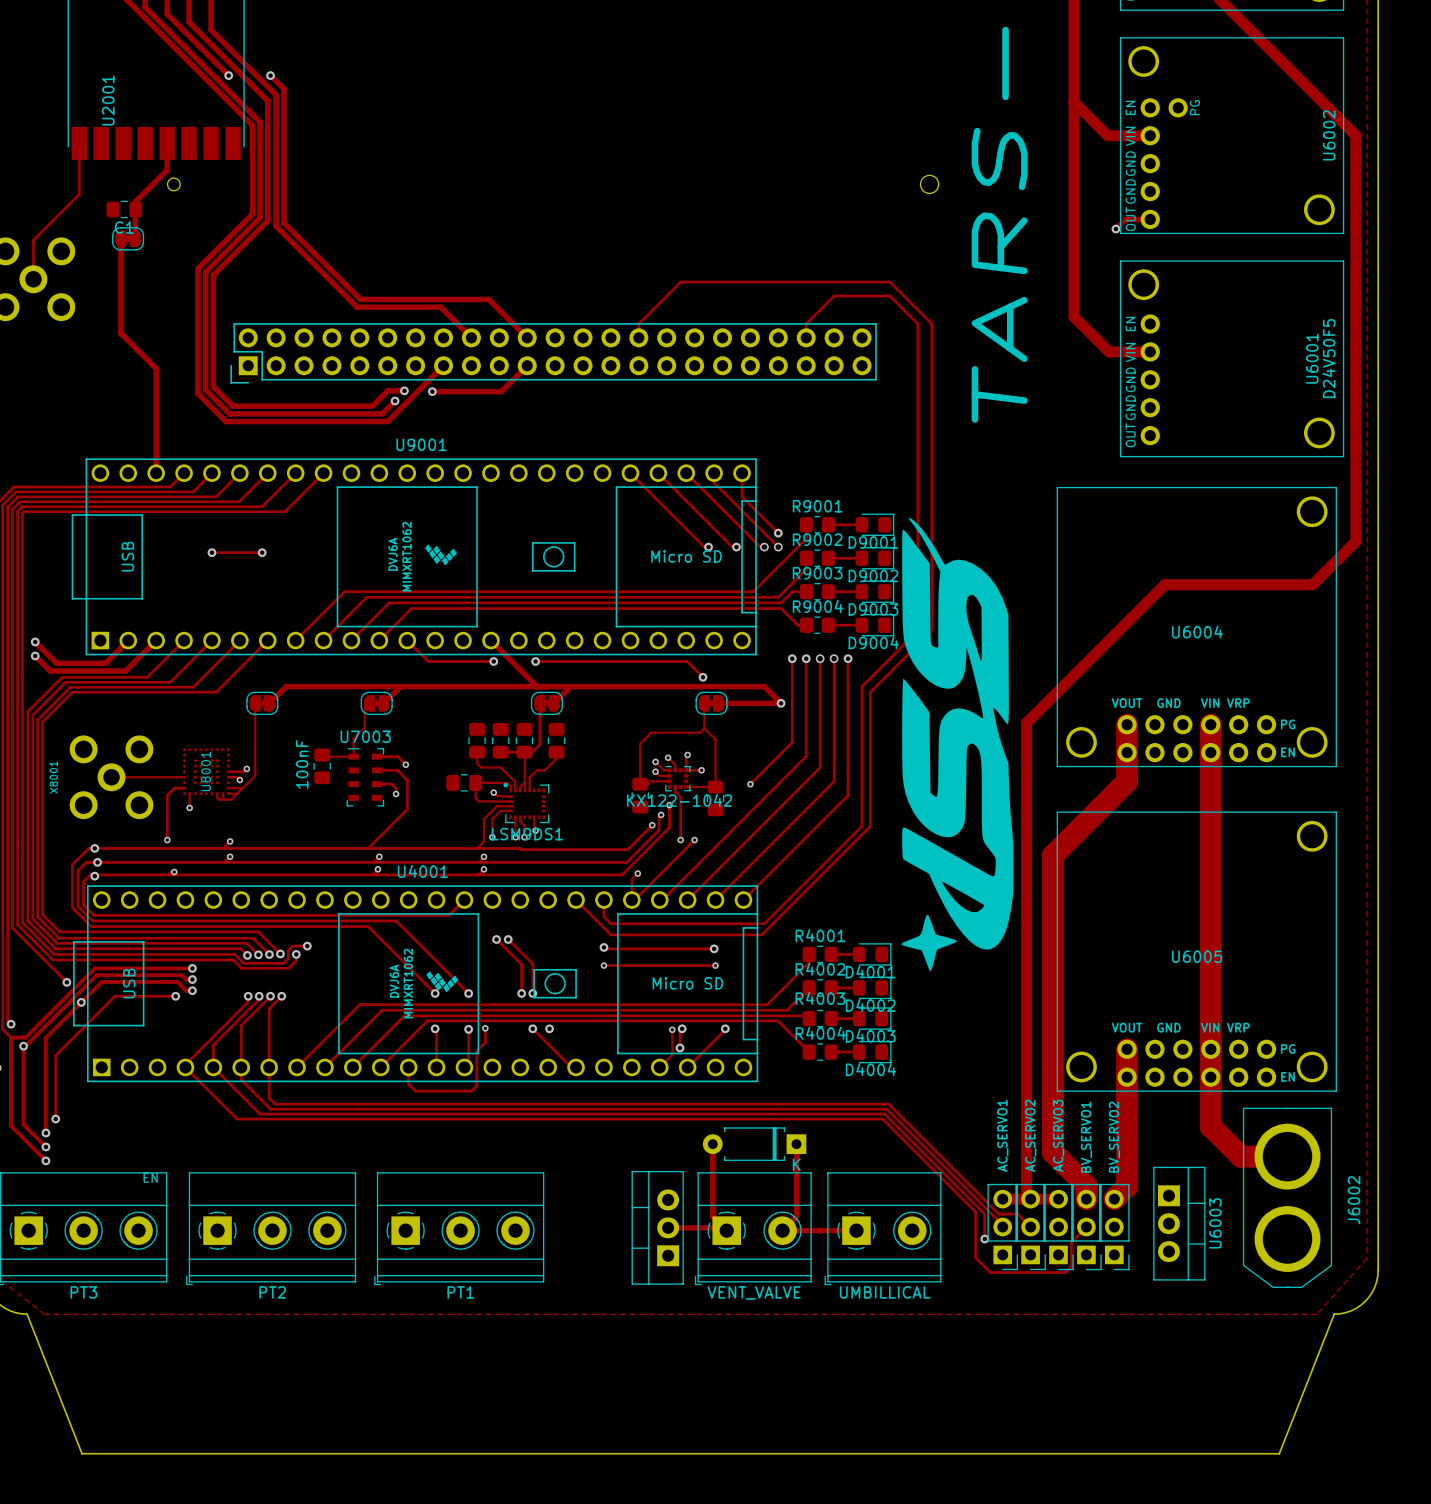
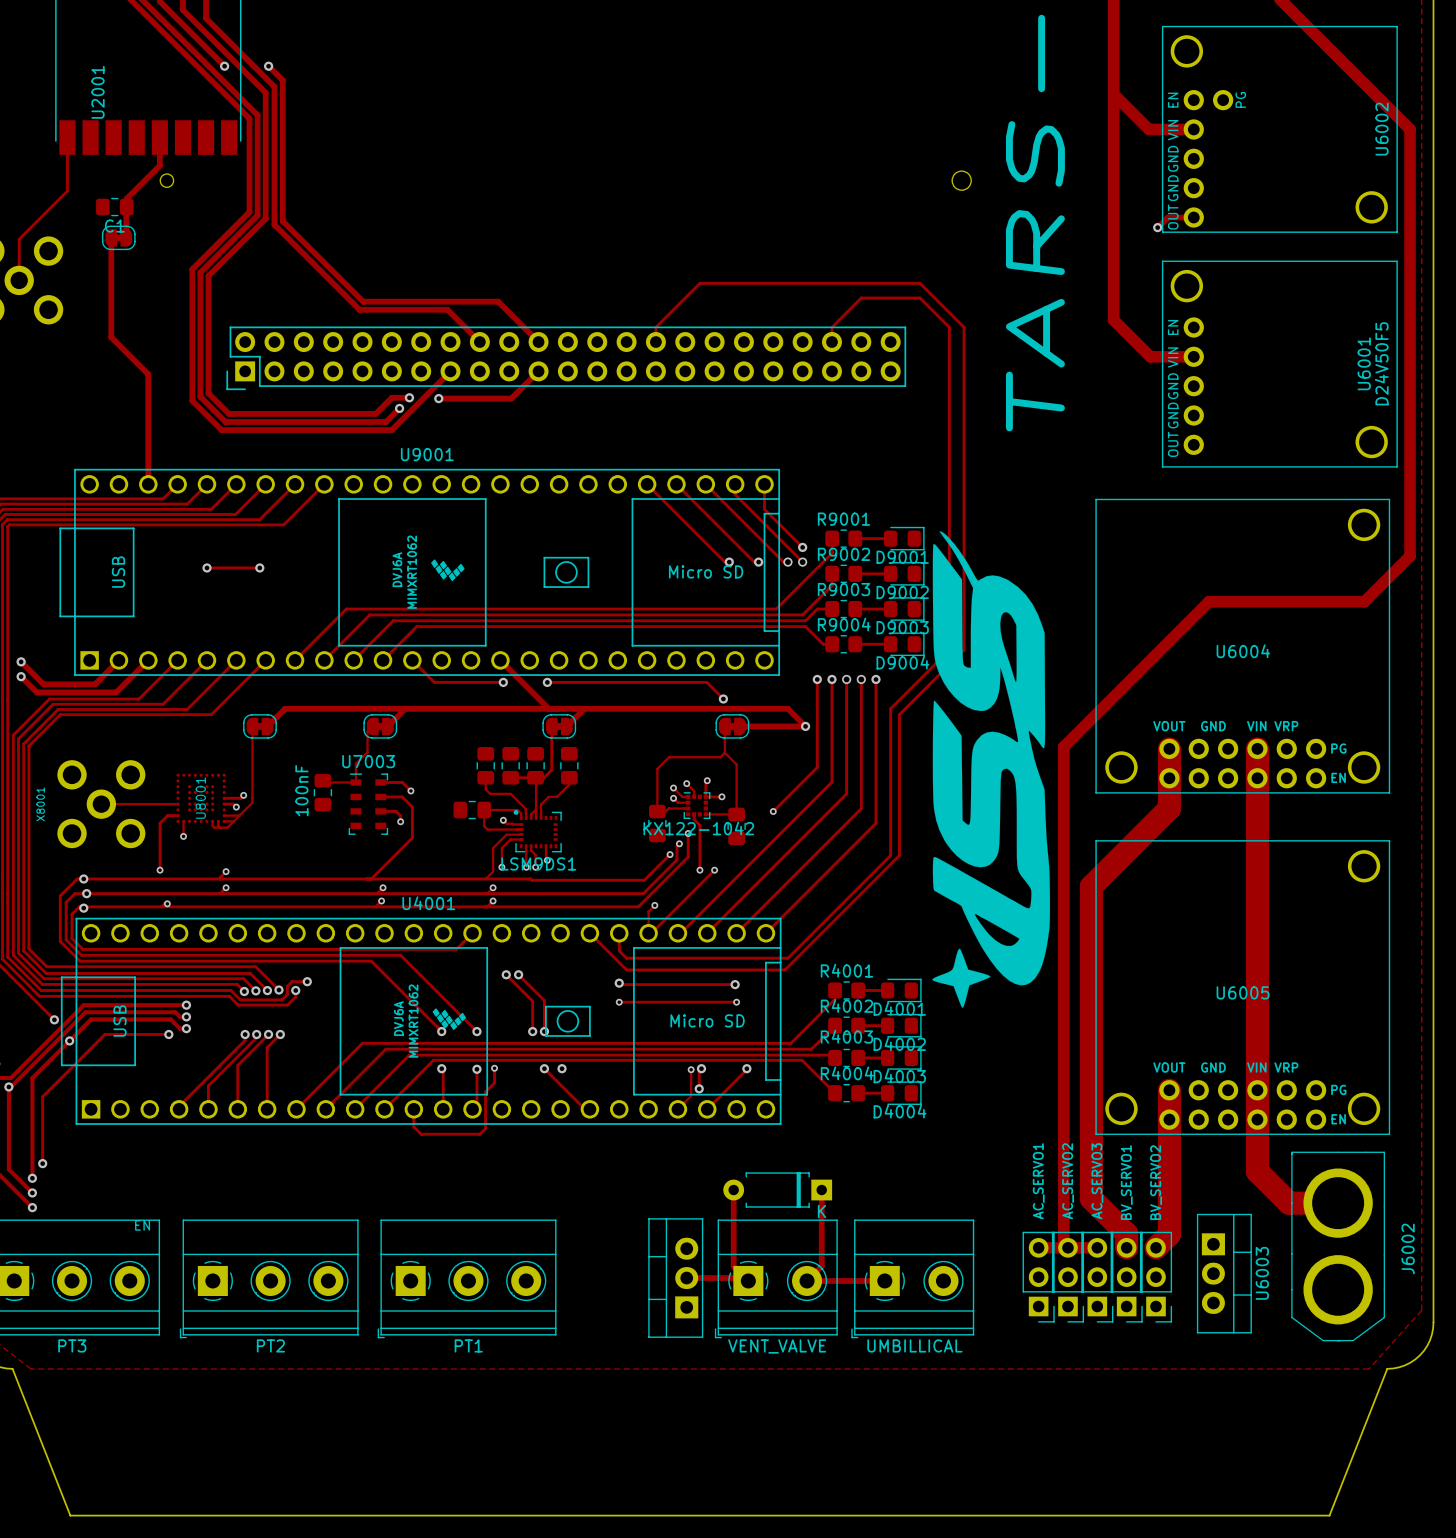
track: (185, 1067) (237, 1119) (882, 1119) (975, 1212) (975, 1257) (990, 1272) (1065, 1272) (1071, 1266) (1071, 1242) (1086, 1227) -> none
track: (213, 1067) (260, 1114) (884, 1114) (984, 1214) (984, 1239) -> none
track: (241, 1067) (241, 1079) (270, 1109) (886, 1109) (1002, 1227) -> none
track: (269, 1067) (269, 1098) (275, 1104) (888, 1104) (998, 1214) (1017, 1214) (1030, 1227) -> none
via: (984, 1239) -> none

